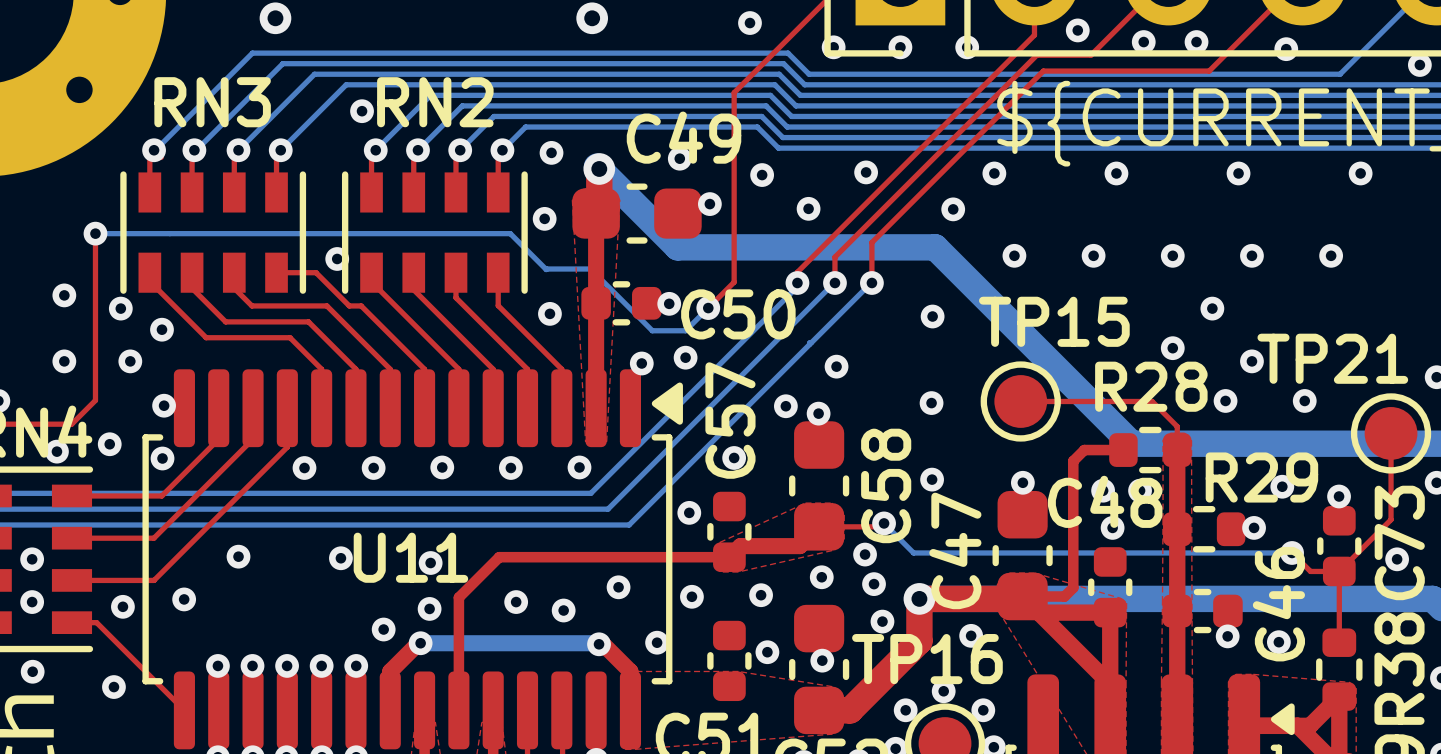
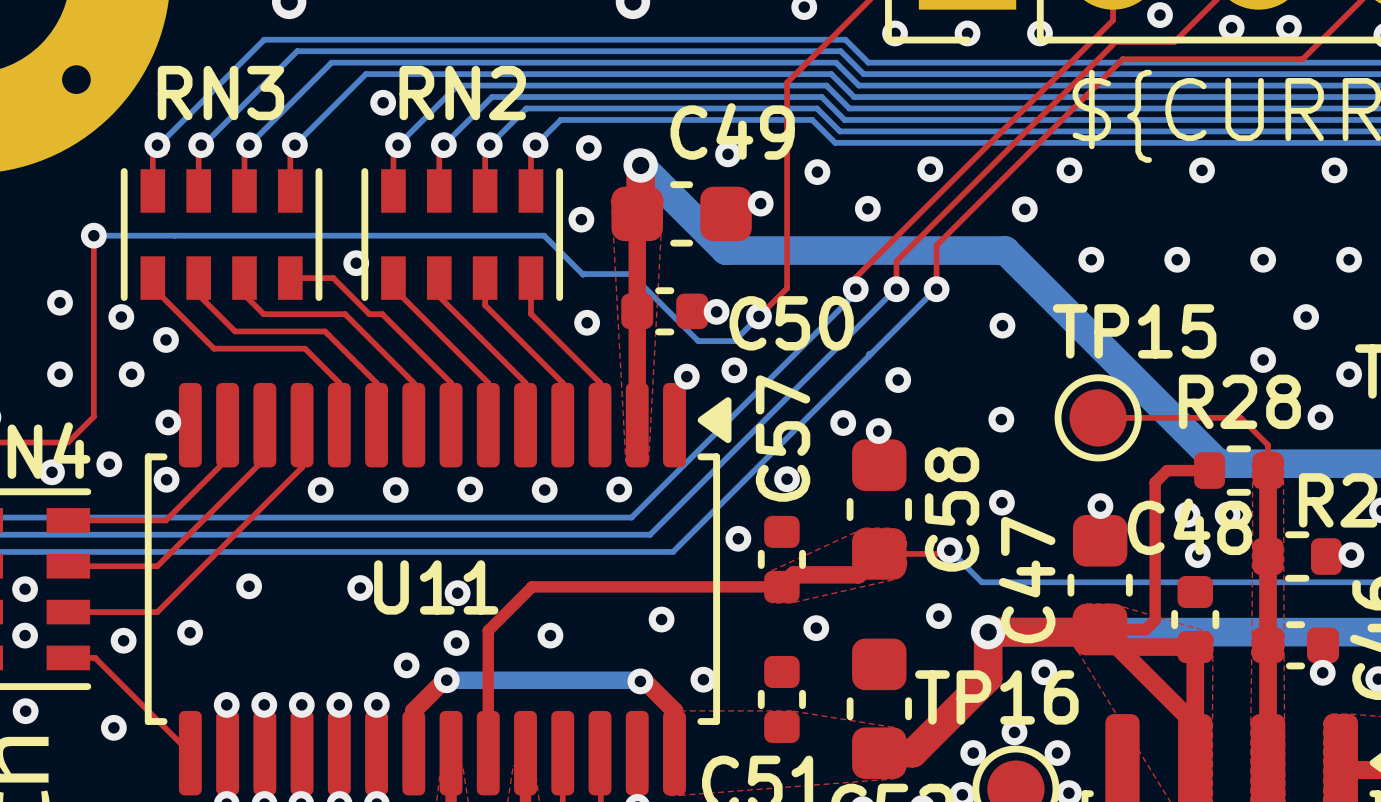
via: (865, 554) -> none
via: (821, 577) -> none
via: (691, 596) -> none
via: (563, 610) -> none
via: (882, 621) -> none
via: (767, 652) -> none
via: (822, 660) -> none

